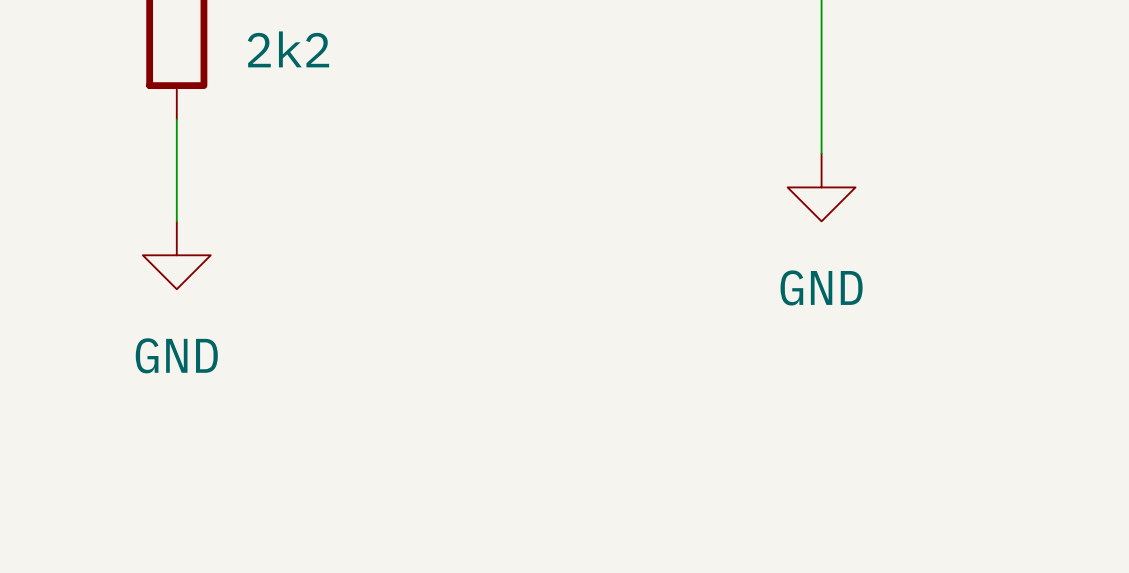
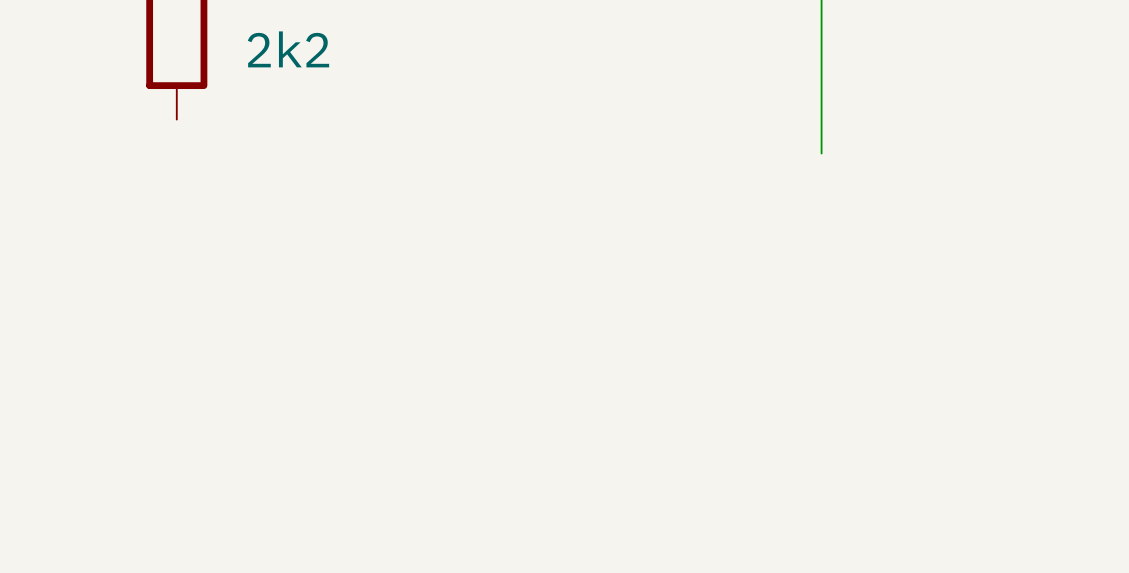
wire: (176, 119) (176, 221) -> none
power symbol: GND (821, 187) -> none
power symbol: GND (176, 255) -> none

